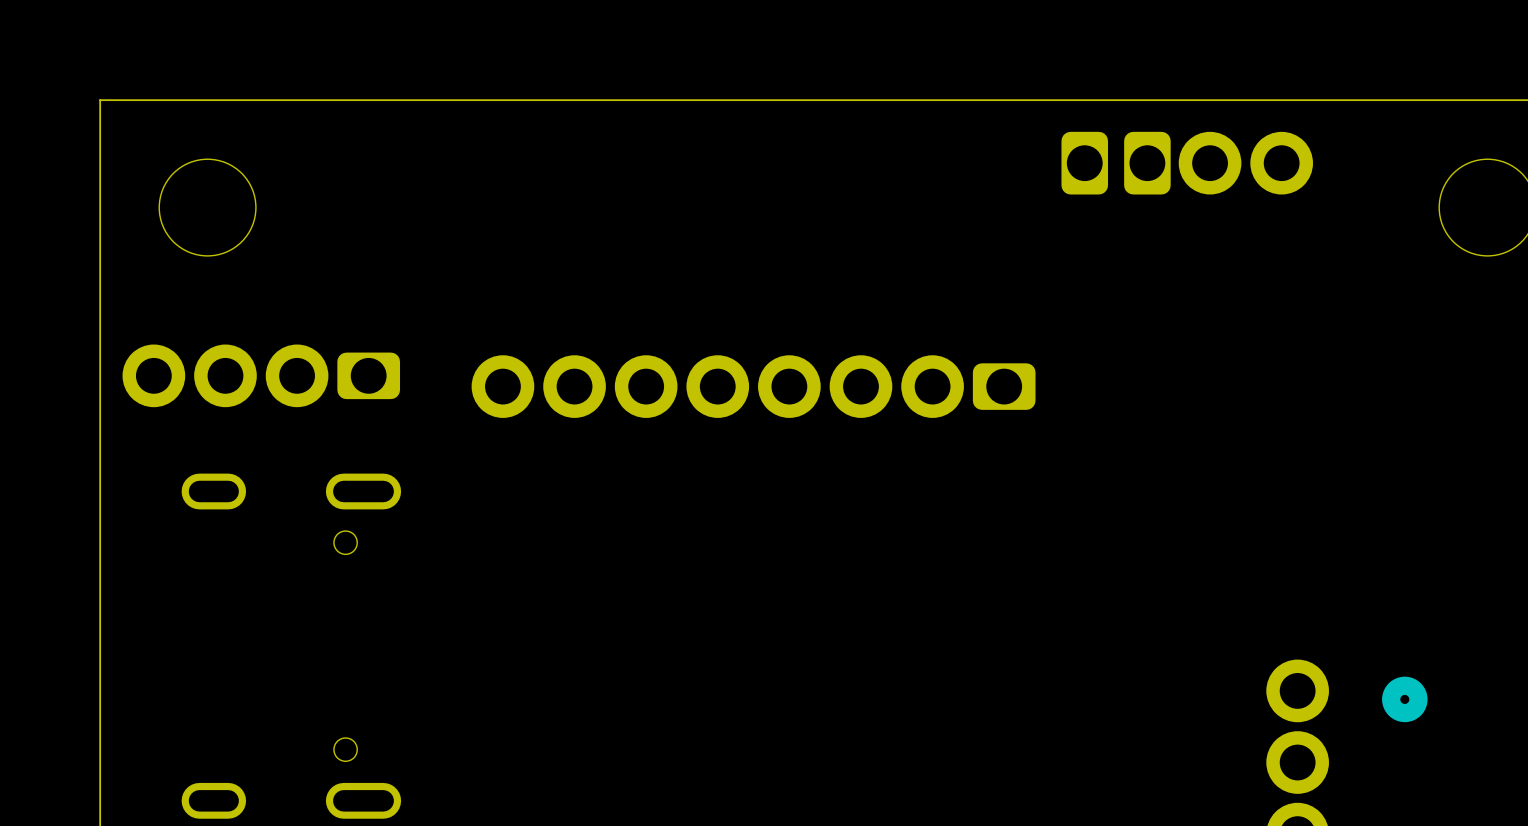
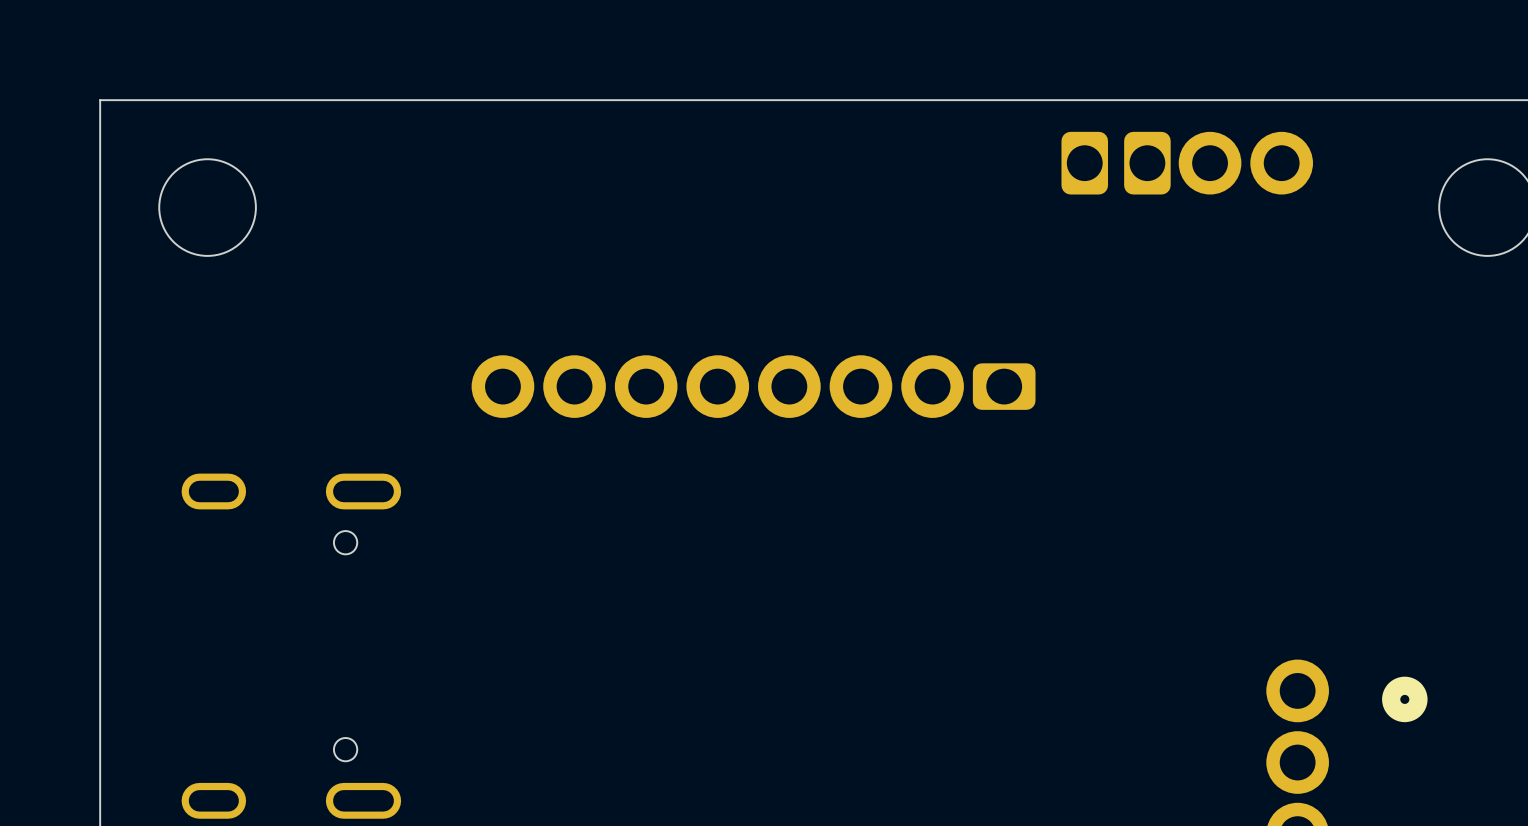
part: (153, 375) -> none
part: (225, 375) -> none
part: (297, 375) -> none
part: (368, 375) -> none

